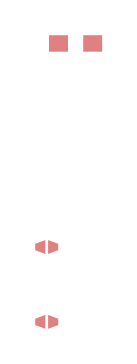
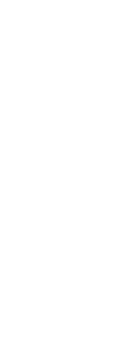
part: (75, 43) -> none
part: (46, 247) -> none
part: (46, 321) -> none

